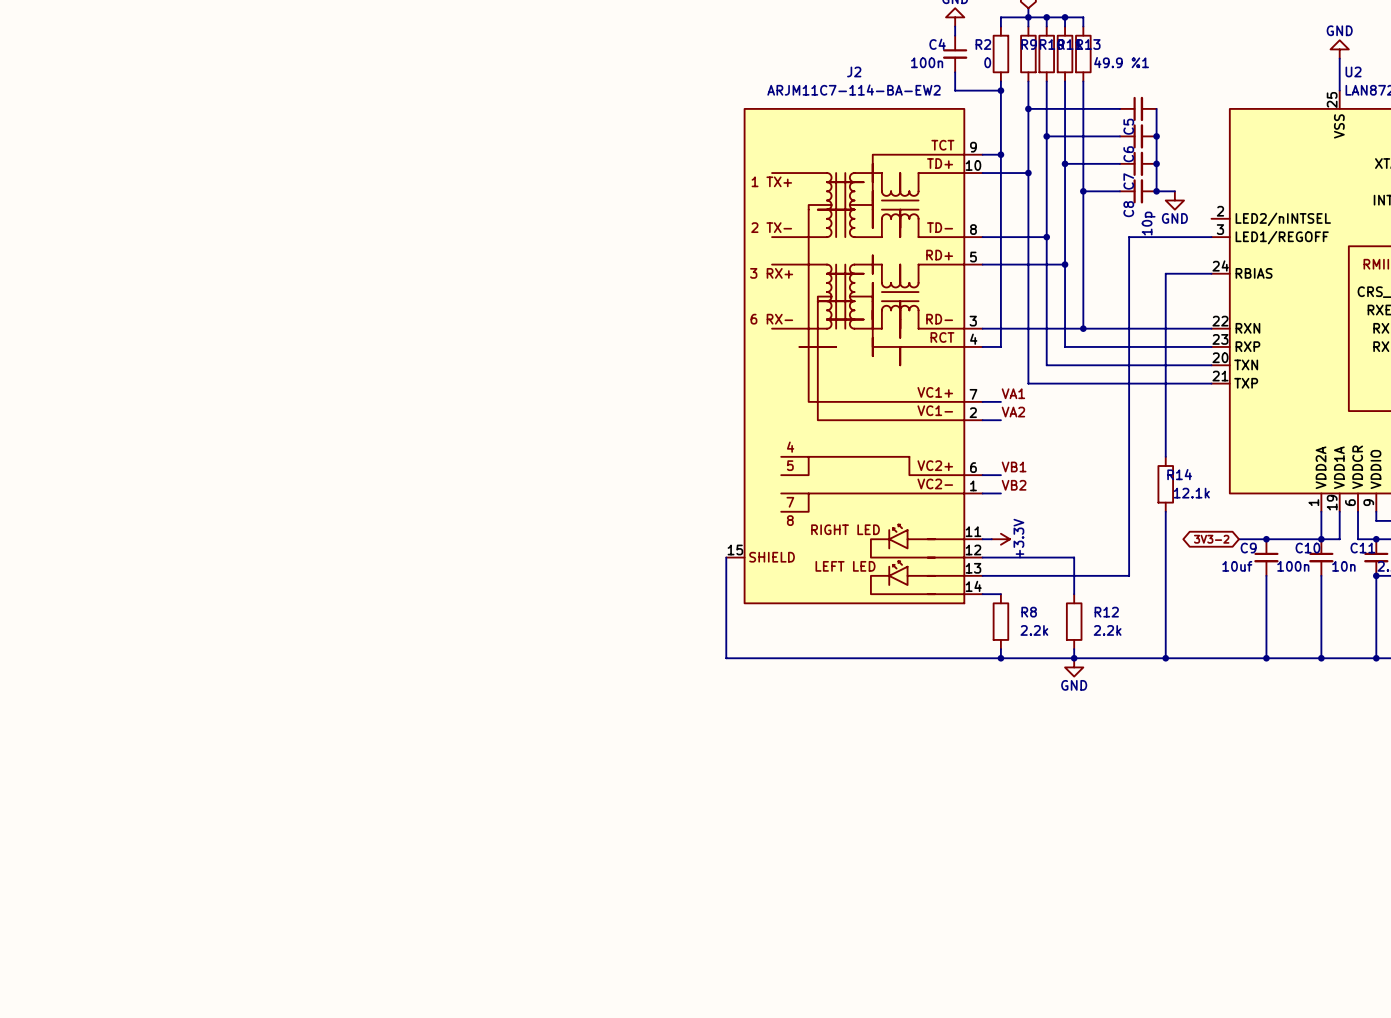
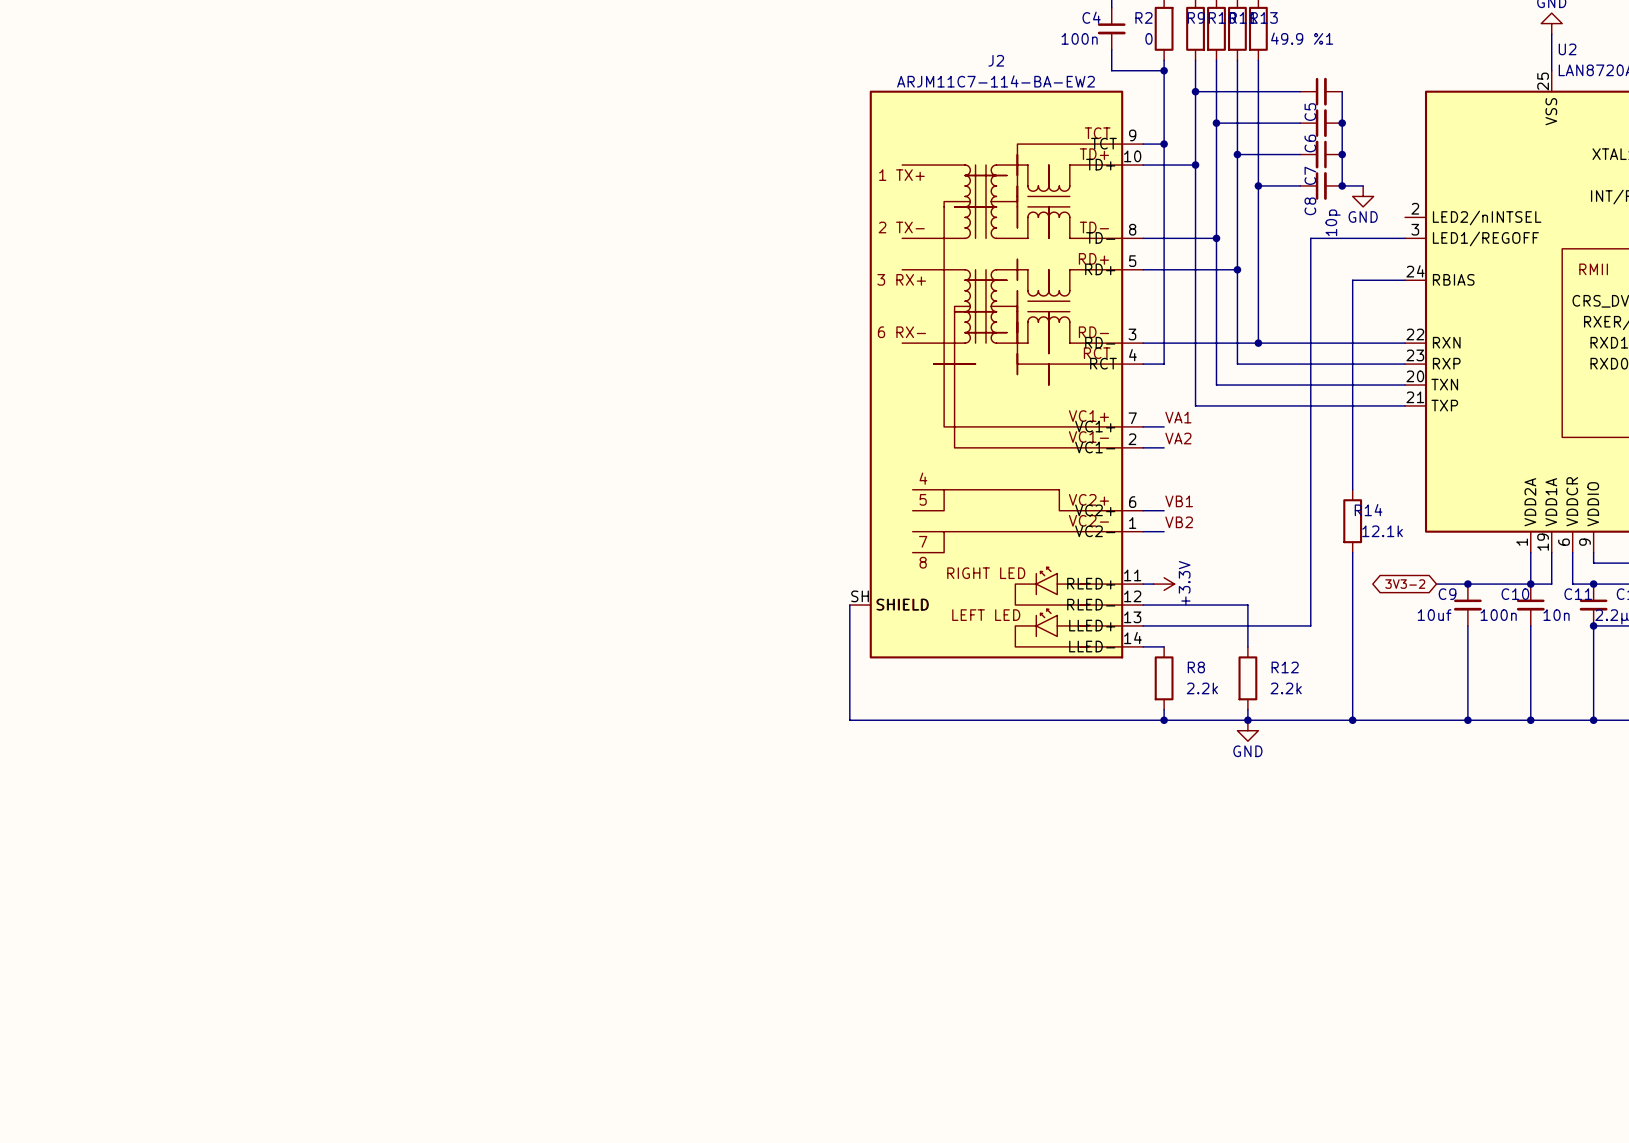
J2 symbol: [726, 108, 983, 605] -> [849, 90, 1144, 659]
C7 rotation: 0° (1138, 163) -> 180° (1321, 154)

